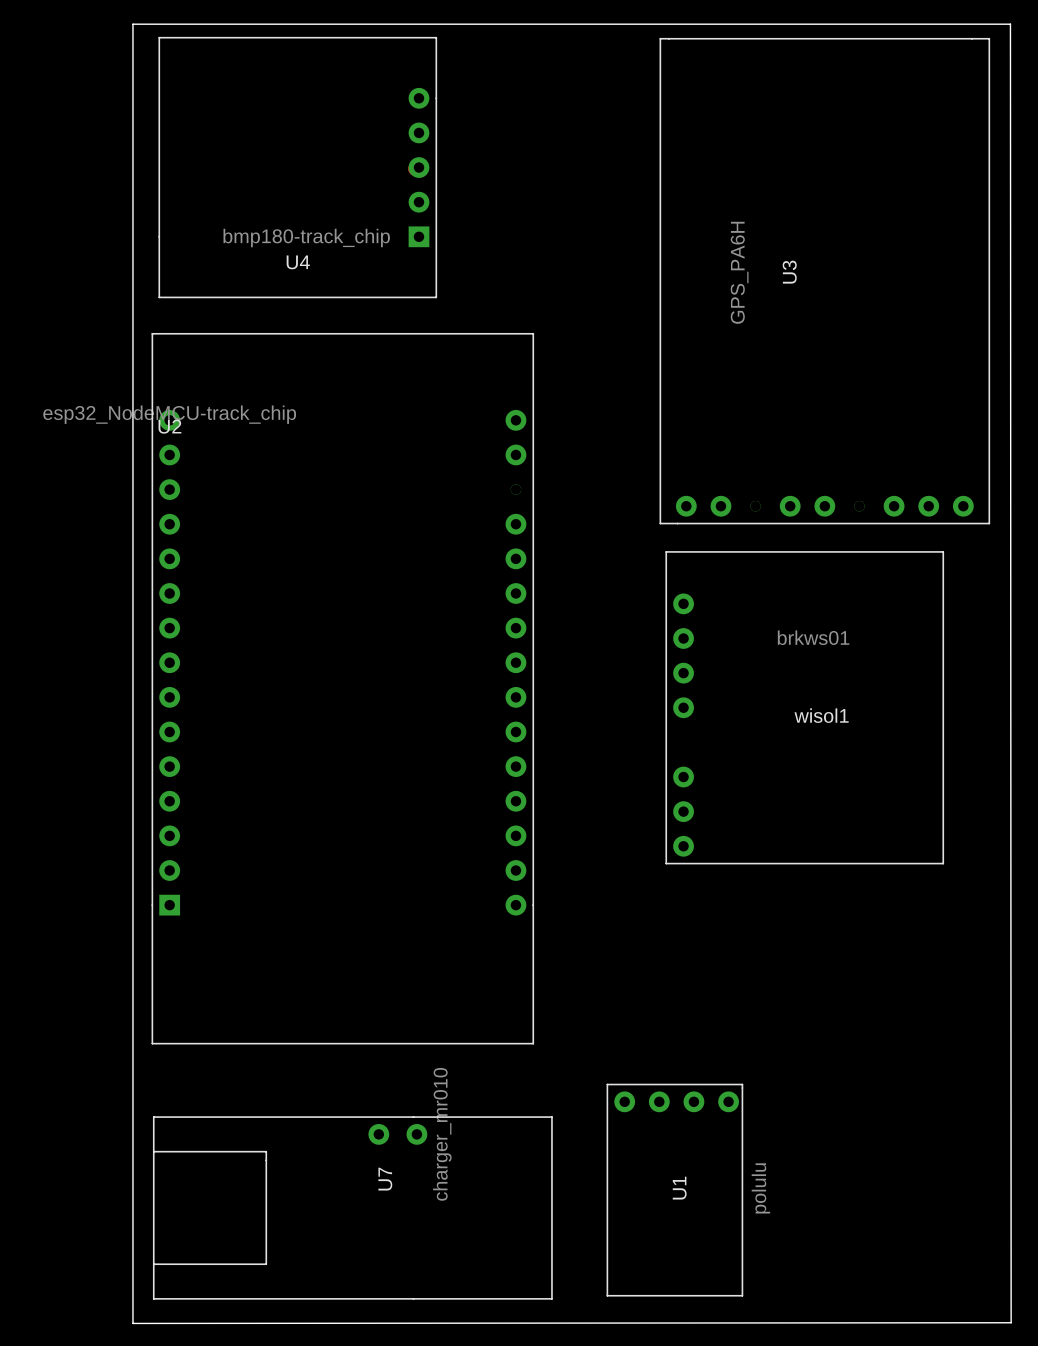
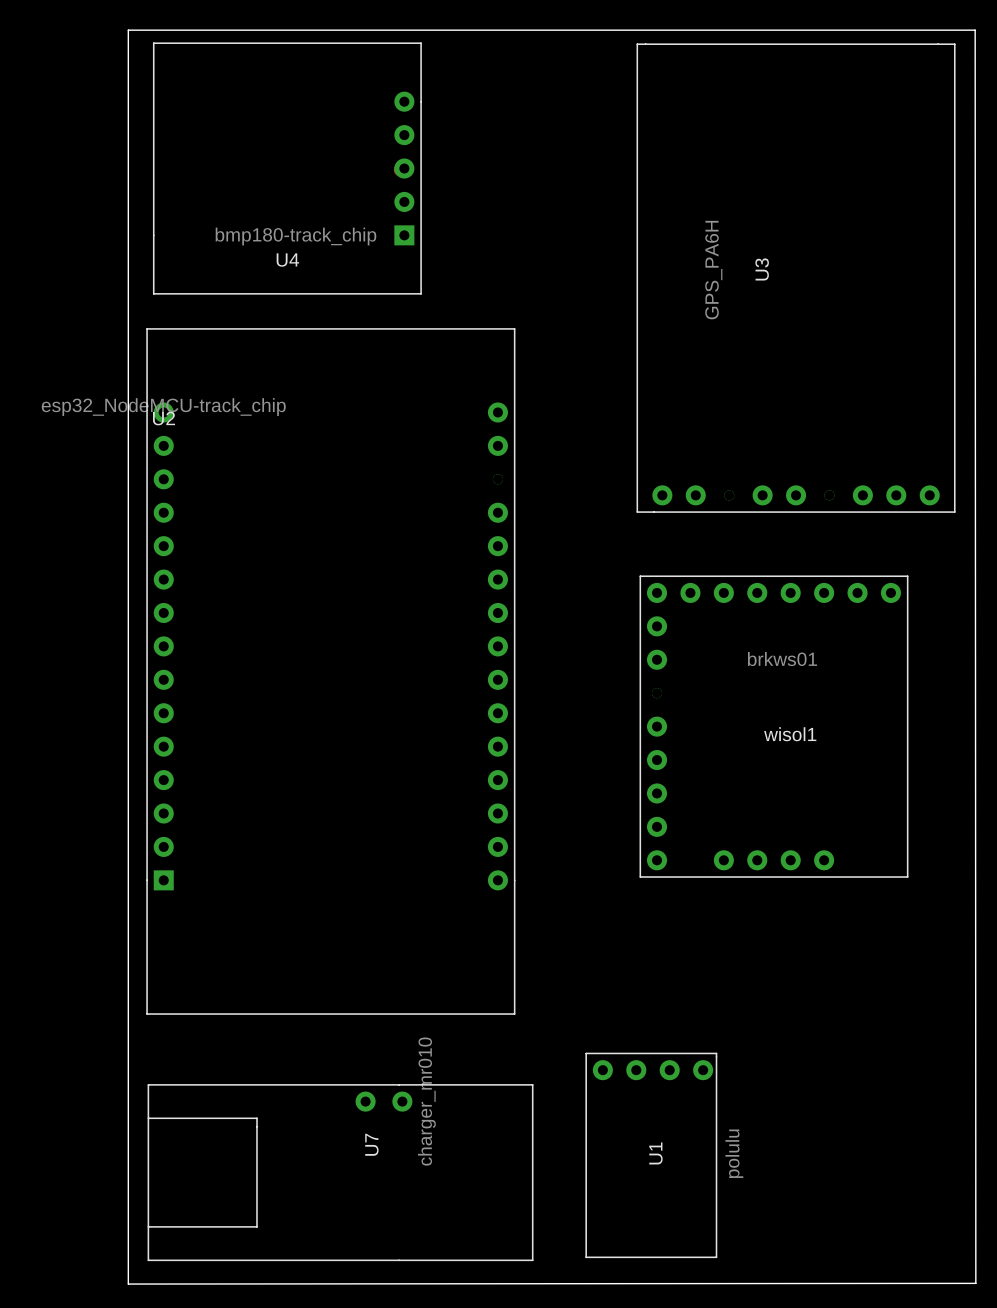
wisol1 footprint: [665, 551, 945, 865] -> [639, 575, 909, 878]

